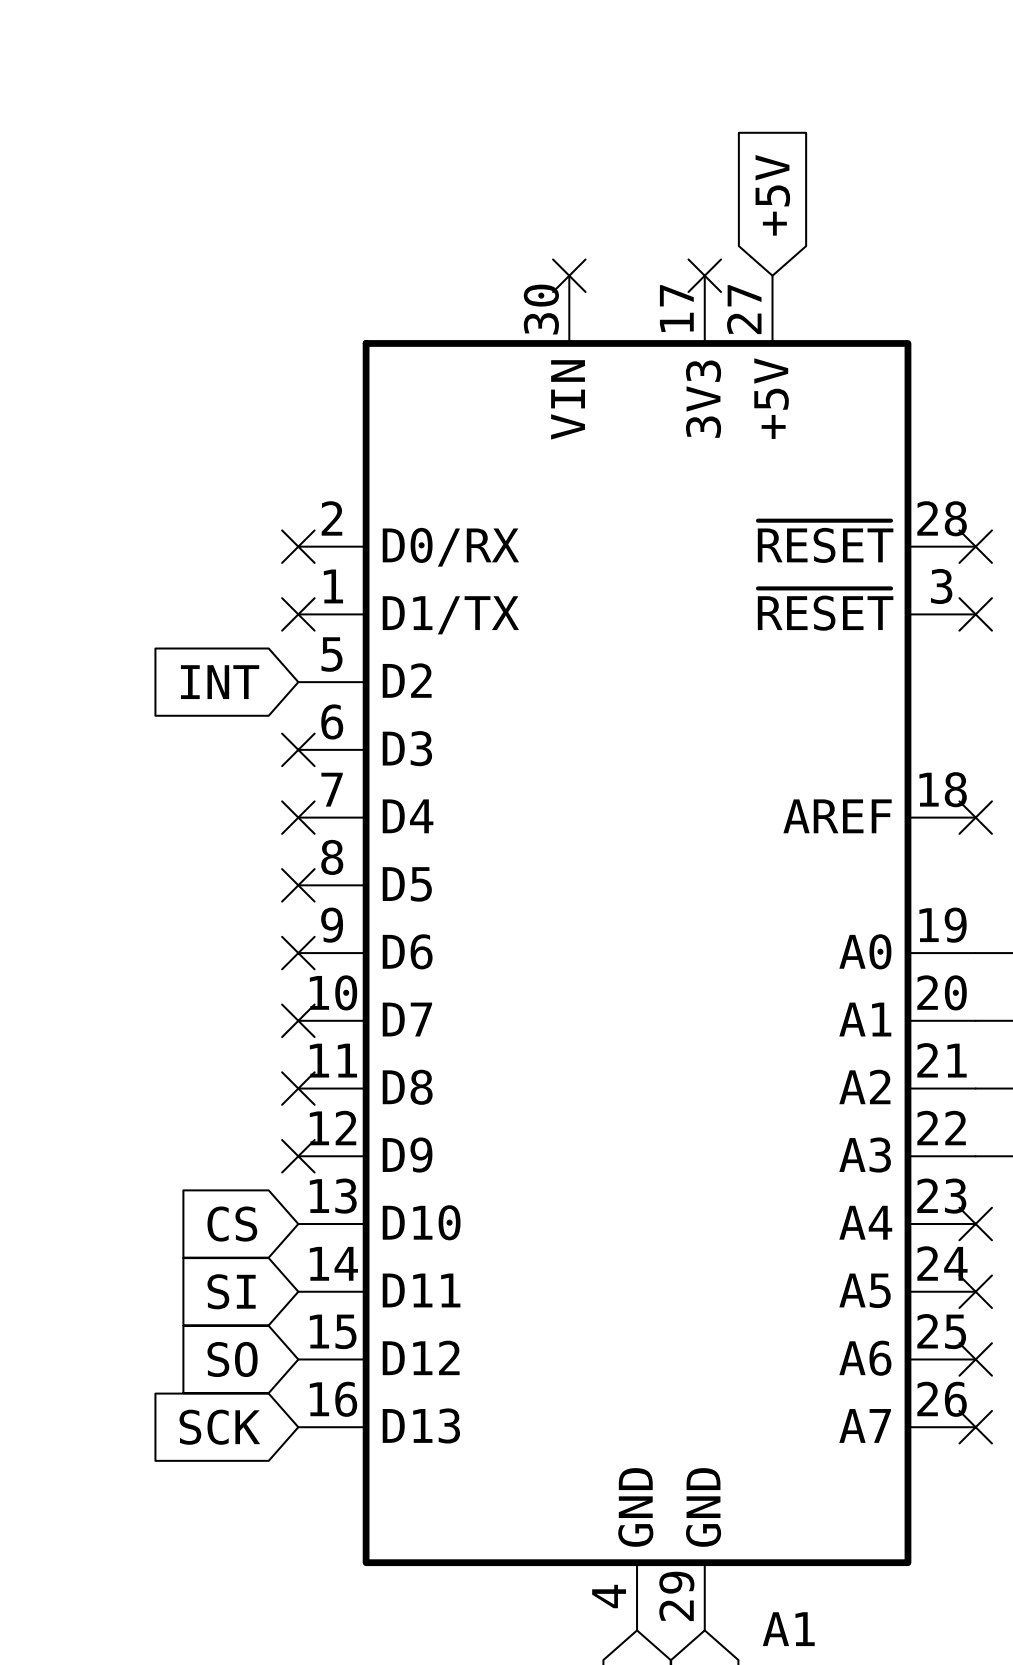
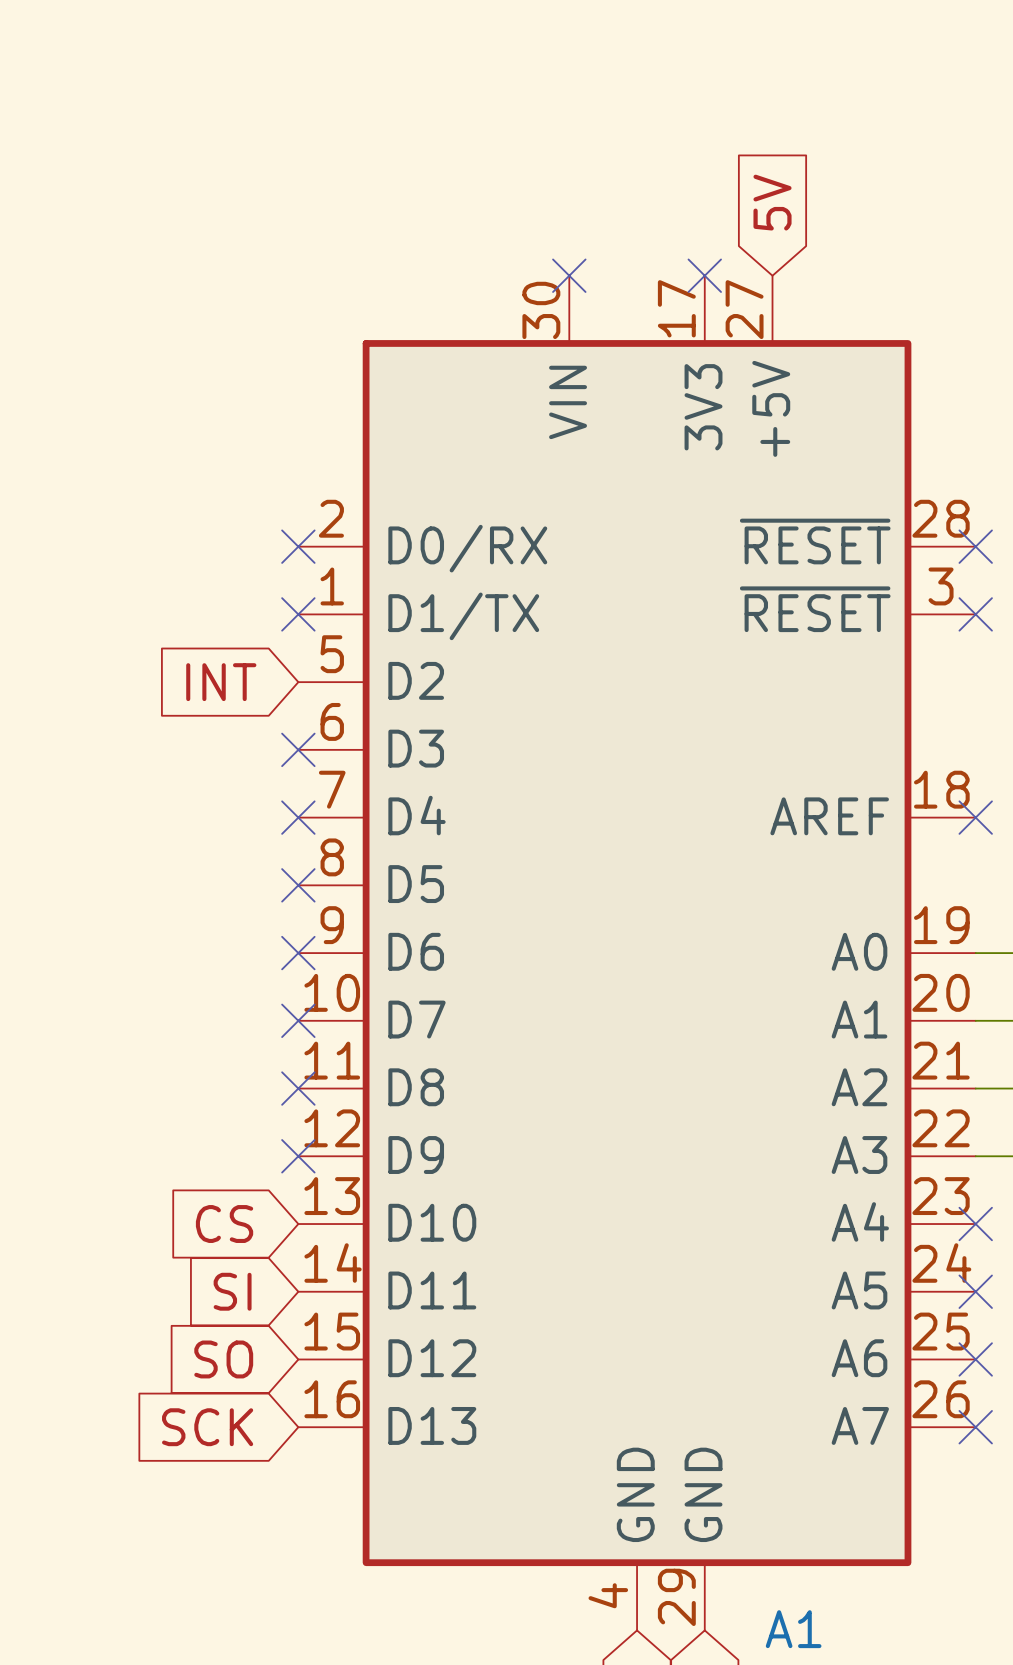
global label: +5V (772, 195) -> 5V (772, 202)

